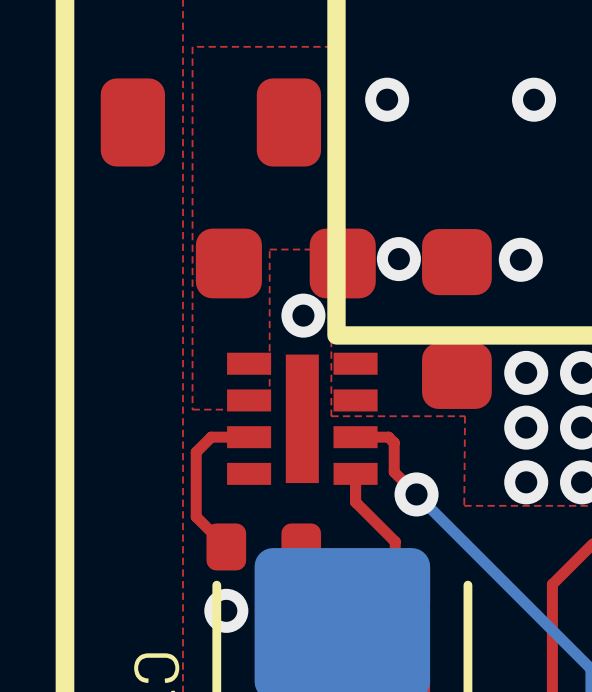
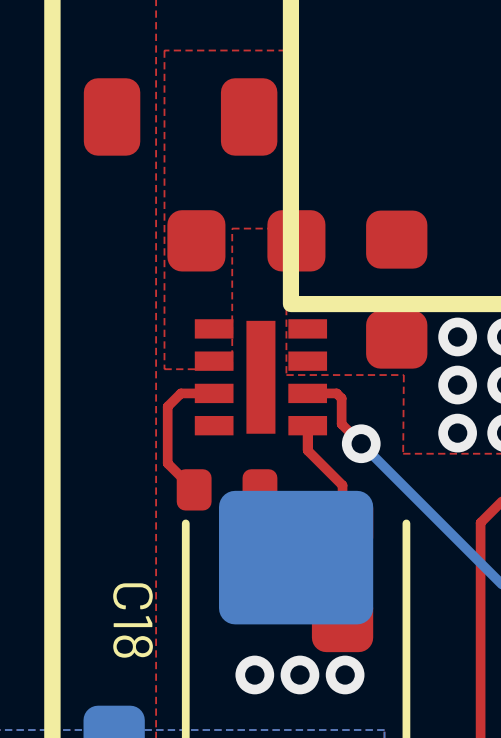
via: (387, 99) -> none
via: (534, 99) -> none
via: (398, 259) -> none
via: (520, 259) -> none
via: (303, 315) -> none
via: (226, 610) -> none

